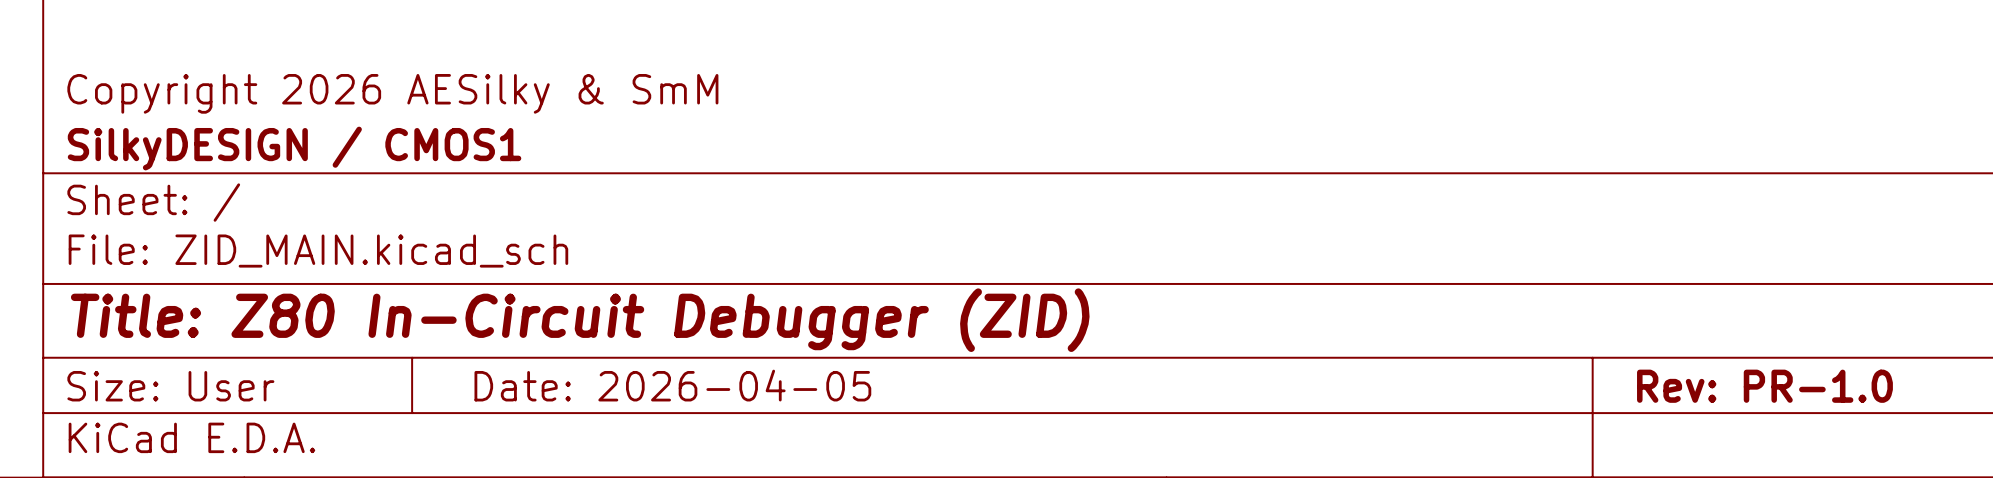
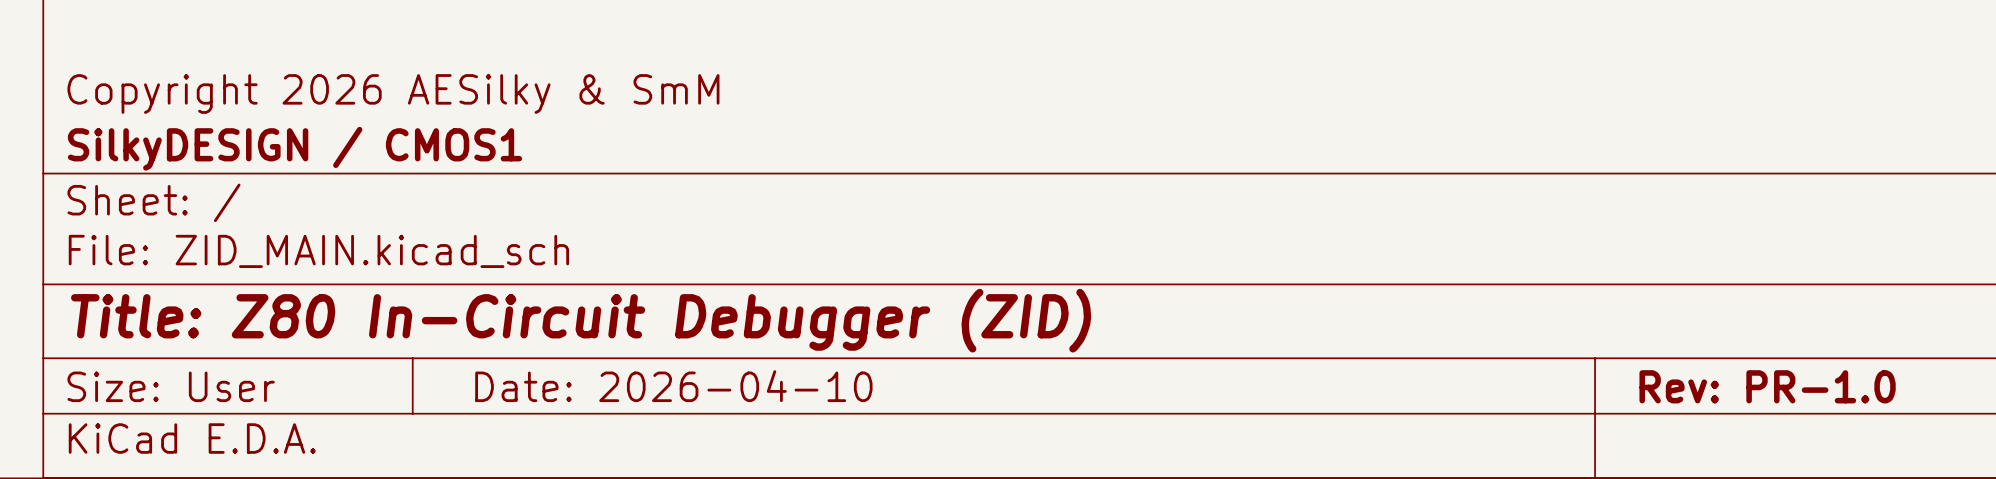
title block: Date: 2026-04-05 (672, 385) -> Date: 2026-04-10 (673, 386)

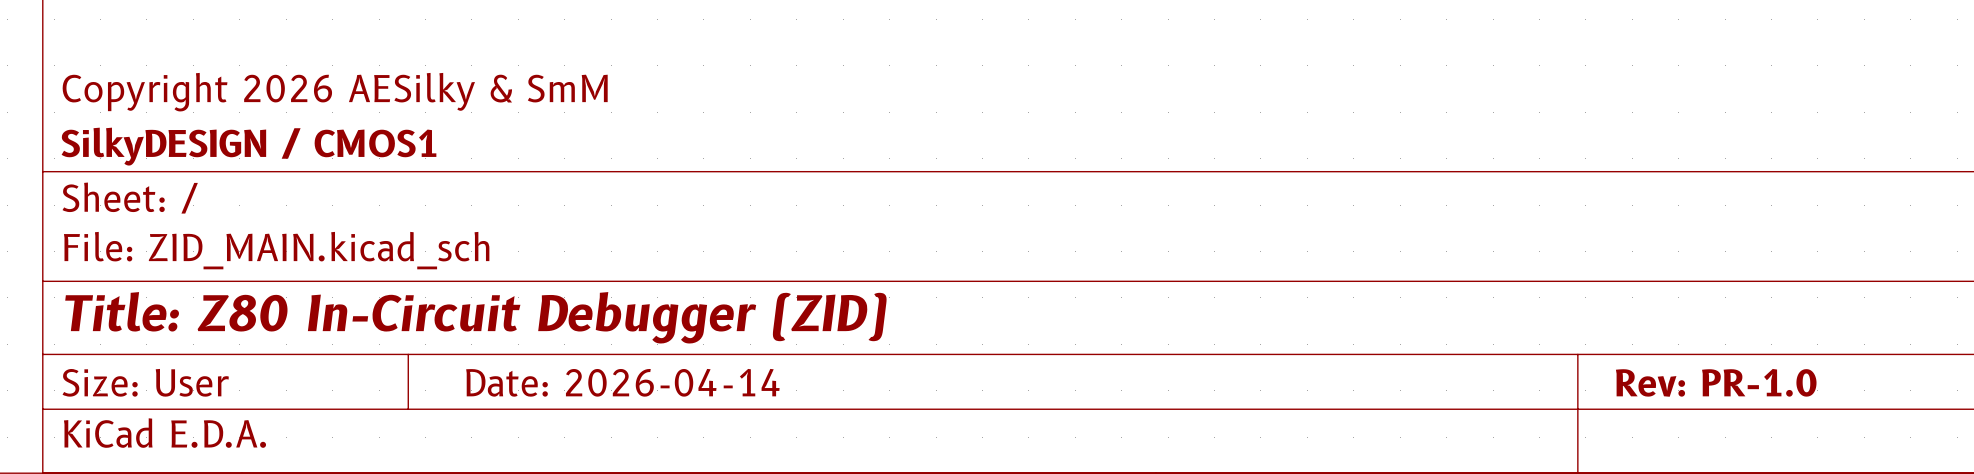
title block: Date: 2026-04-10 (673, 386) -> Date: 2026-04-14 (622, 382)

